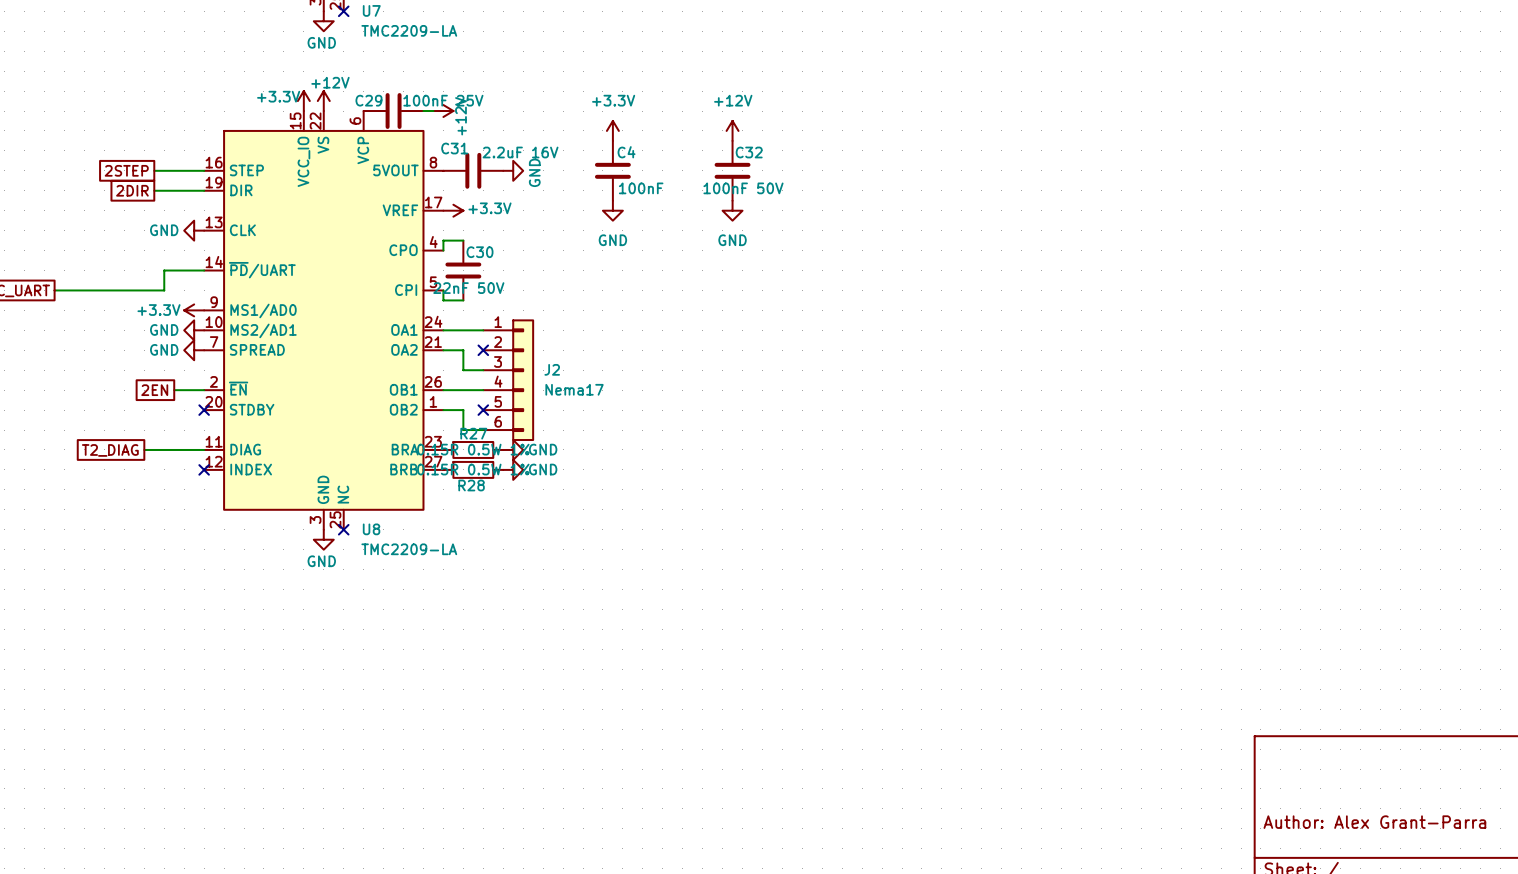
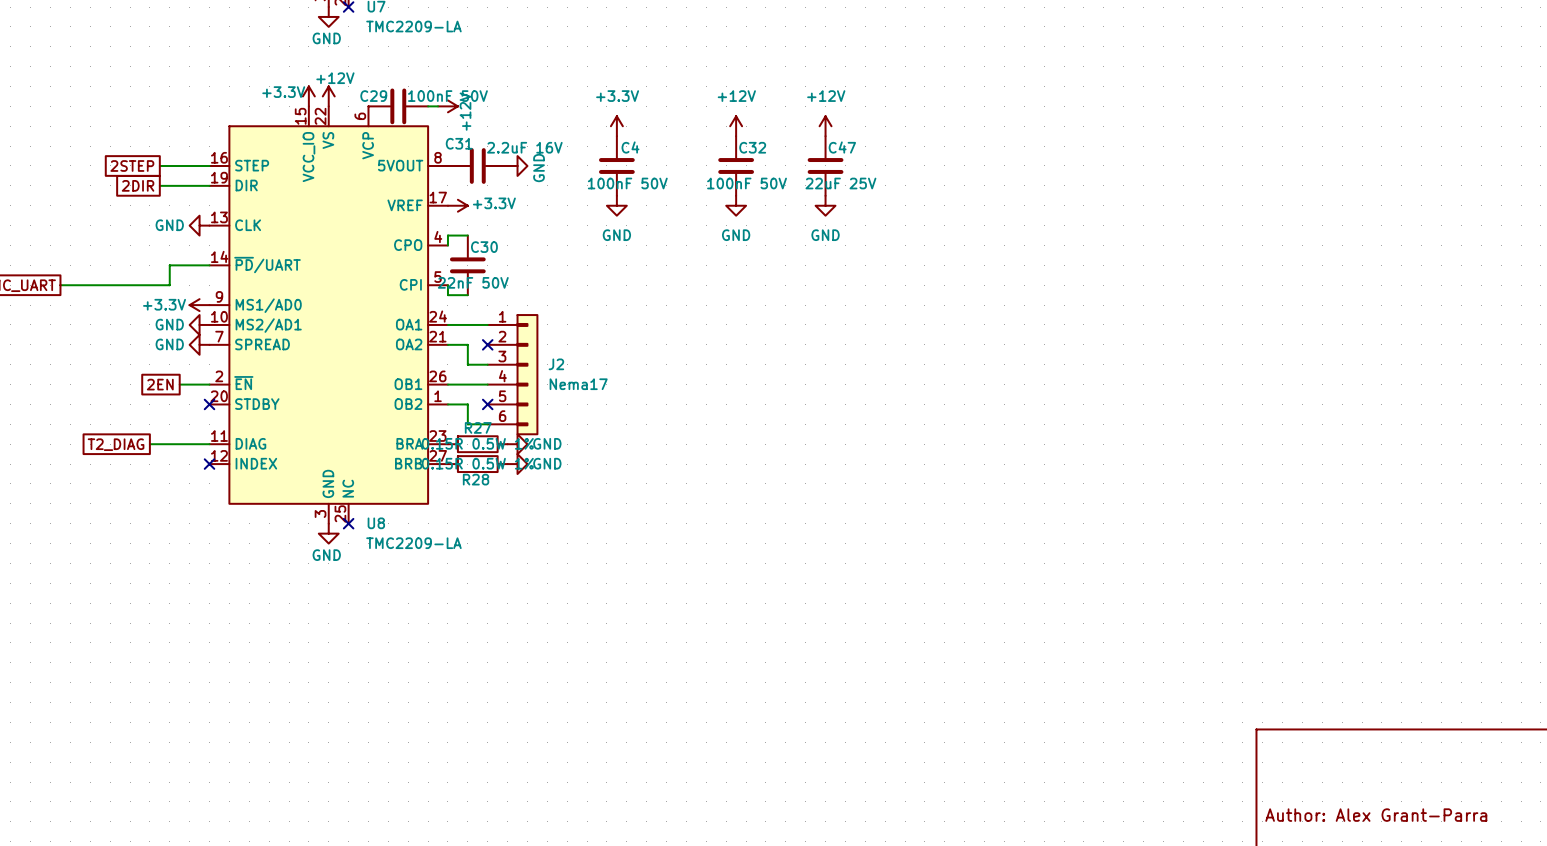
C29 value: 100nF 25V (443, 100) -> 100nF 50V (447, 96)
power symbol: none -> +12V (825, 126)
C47: none -> 22uF 25V (825, 165)
C4 value: 100nF (641, 188) -> 100nF 50V (627, 183)
power symbol: none -> GND (825, 205)

